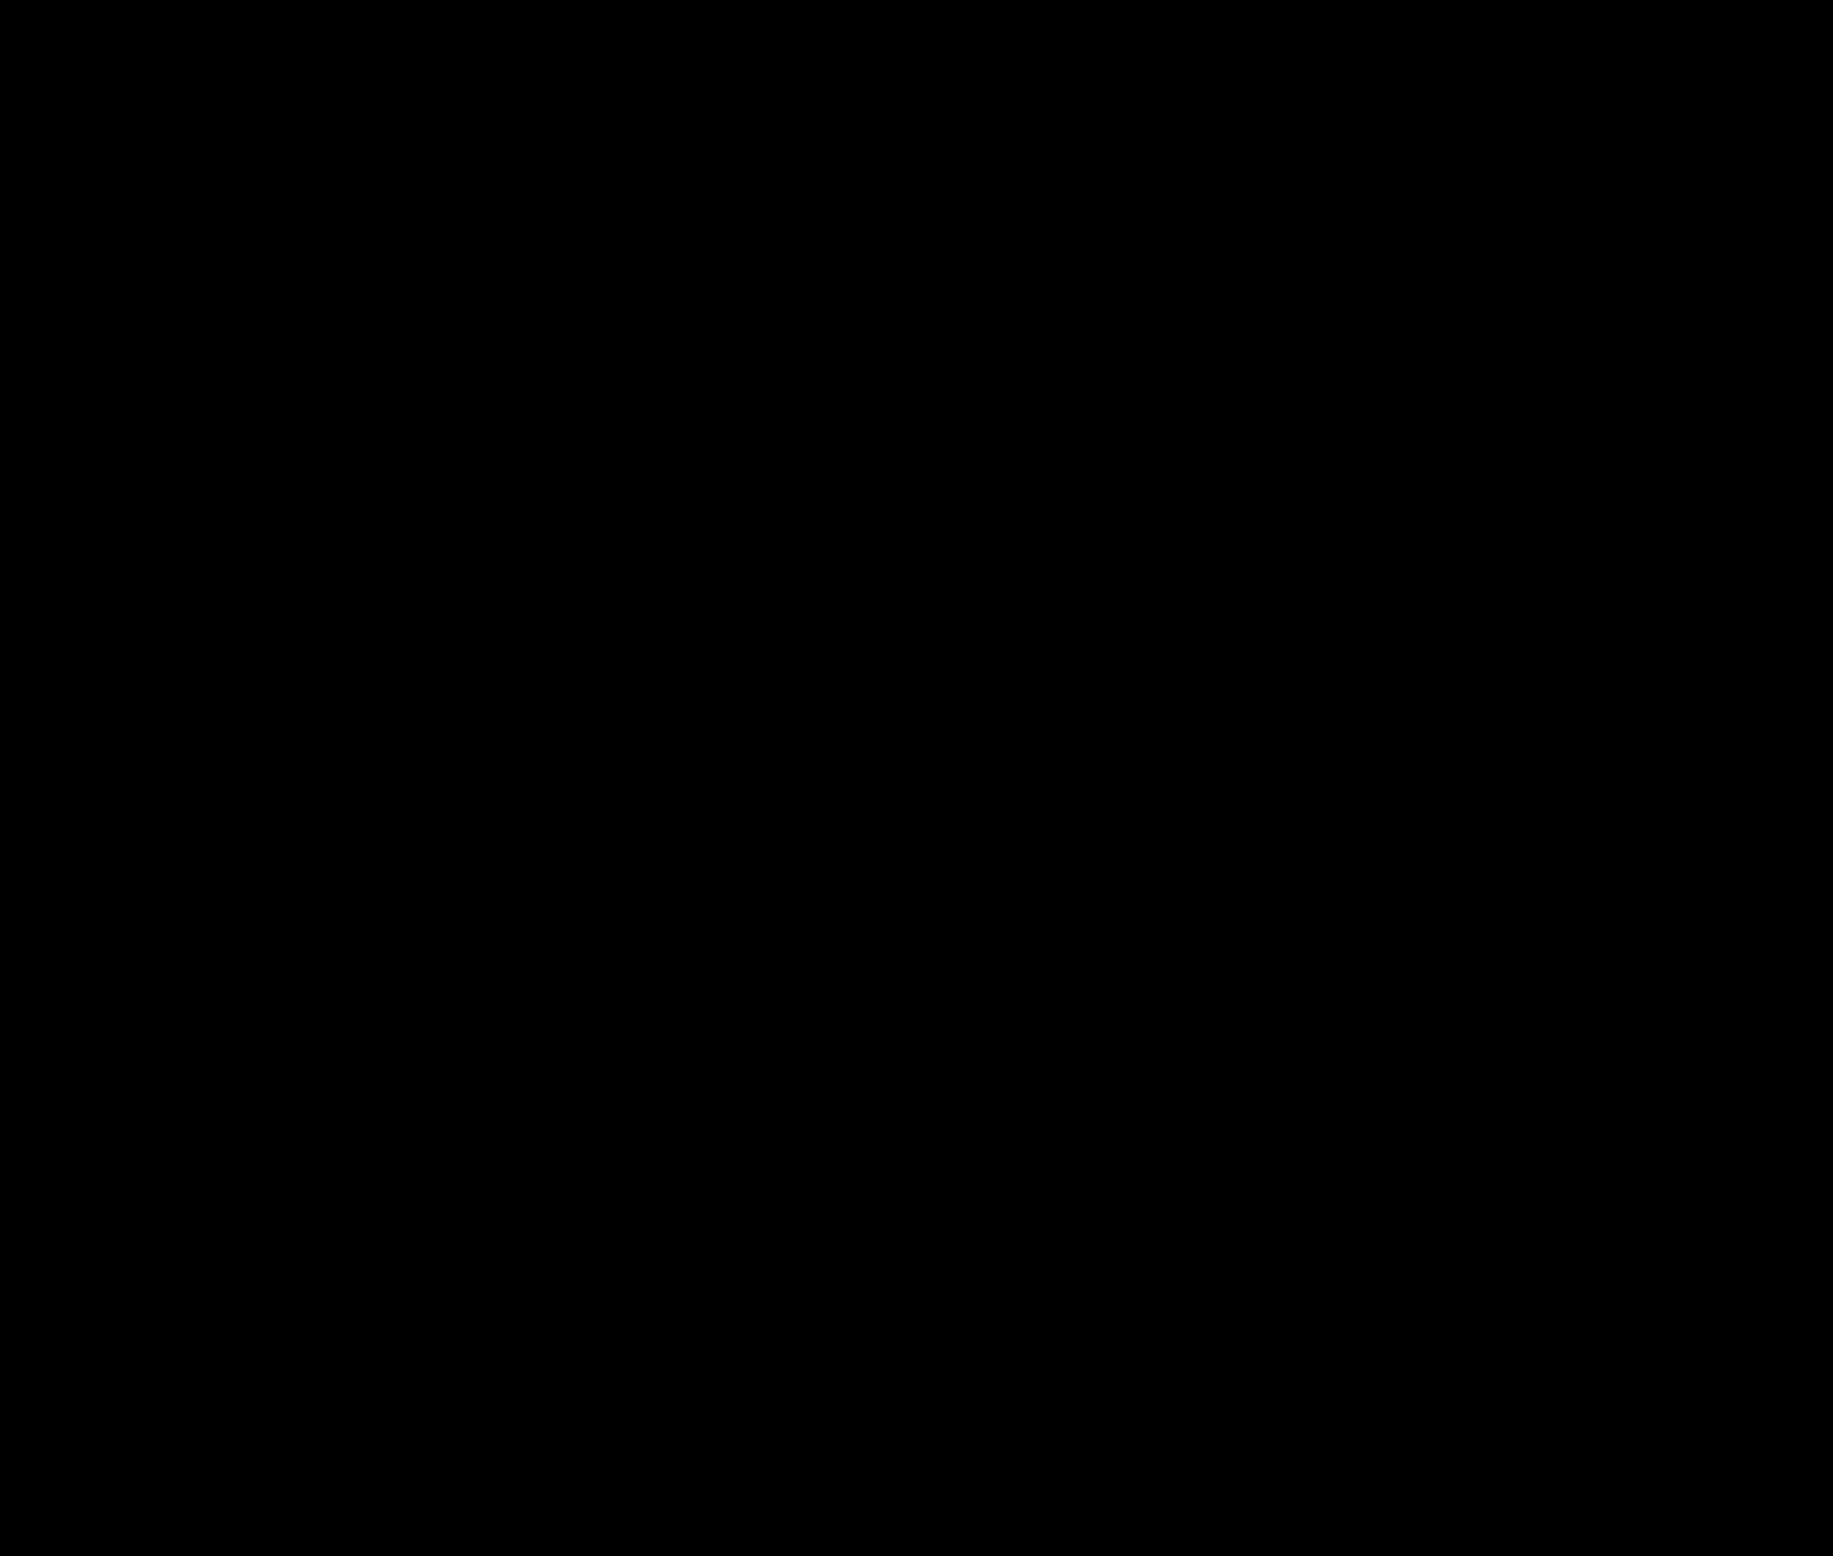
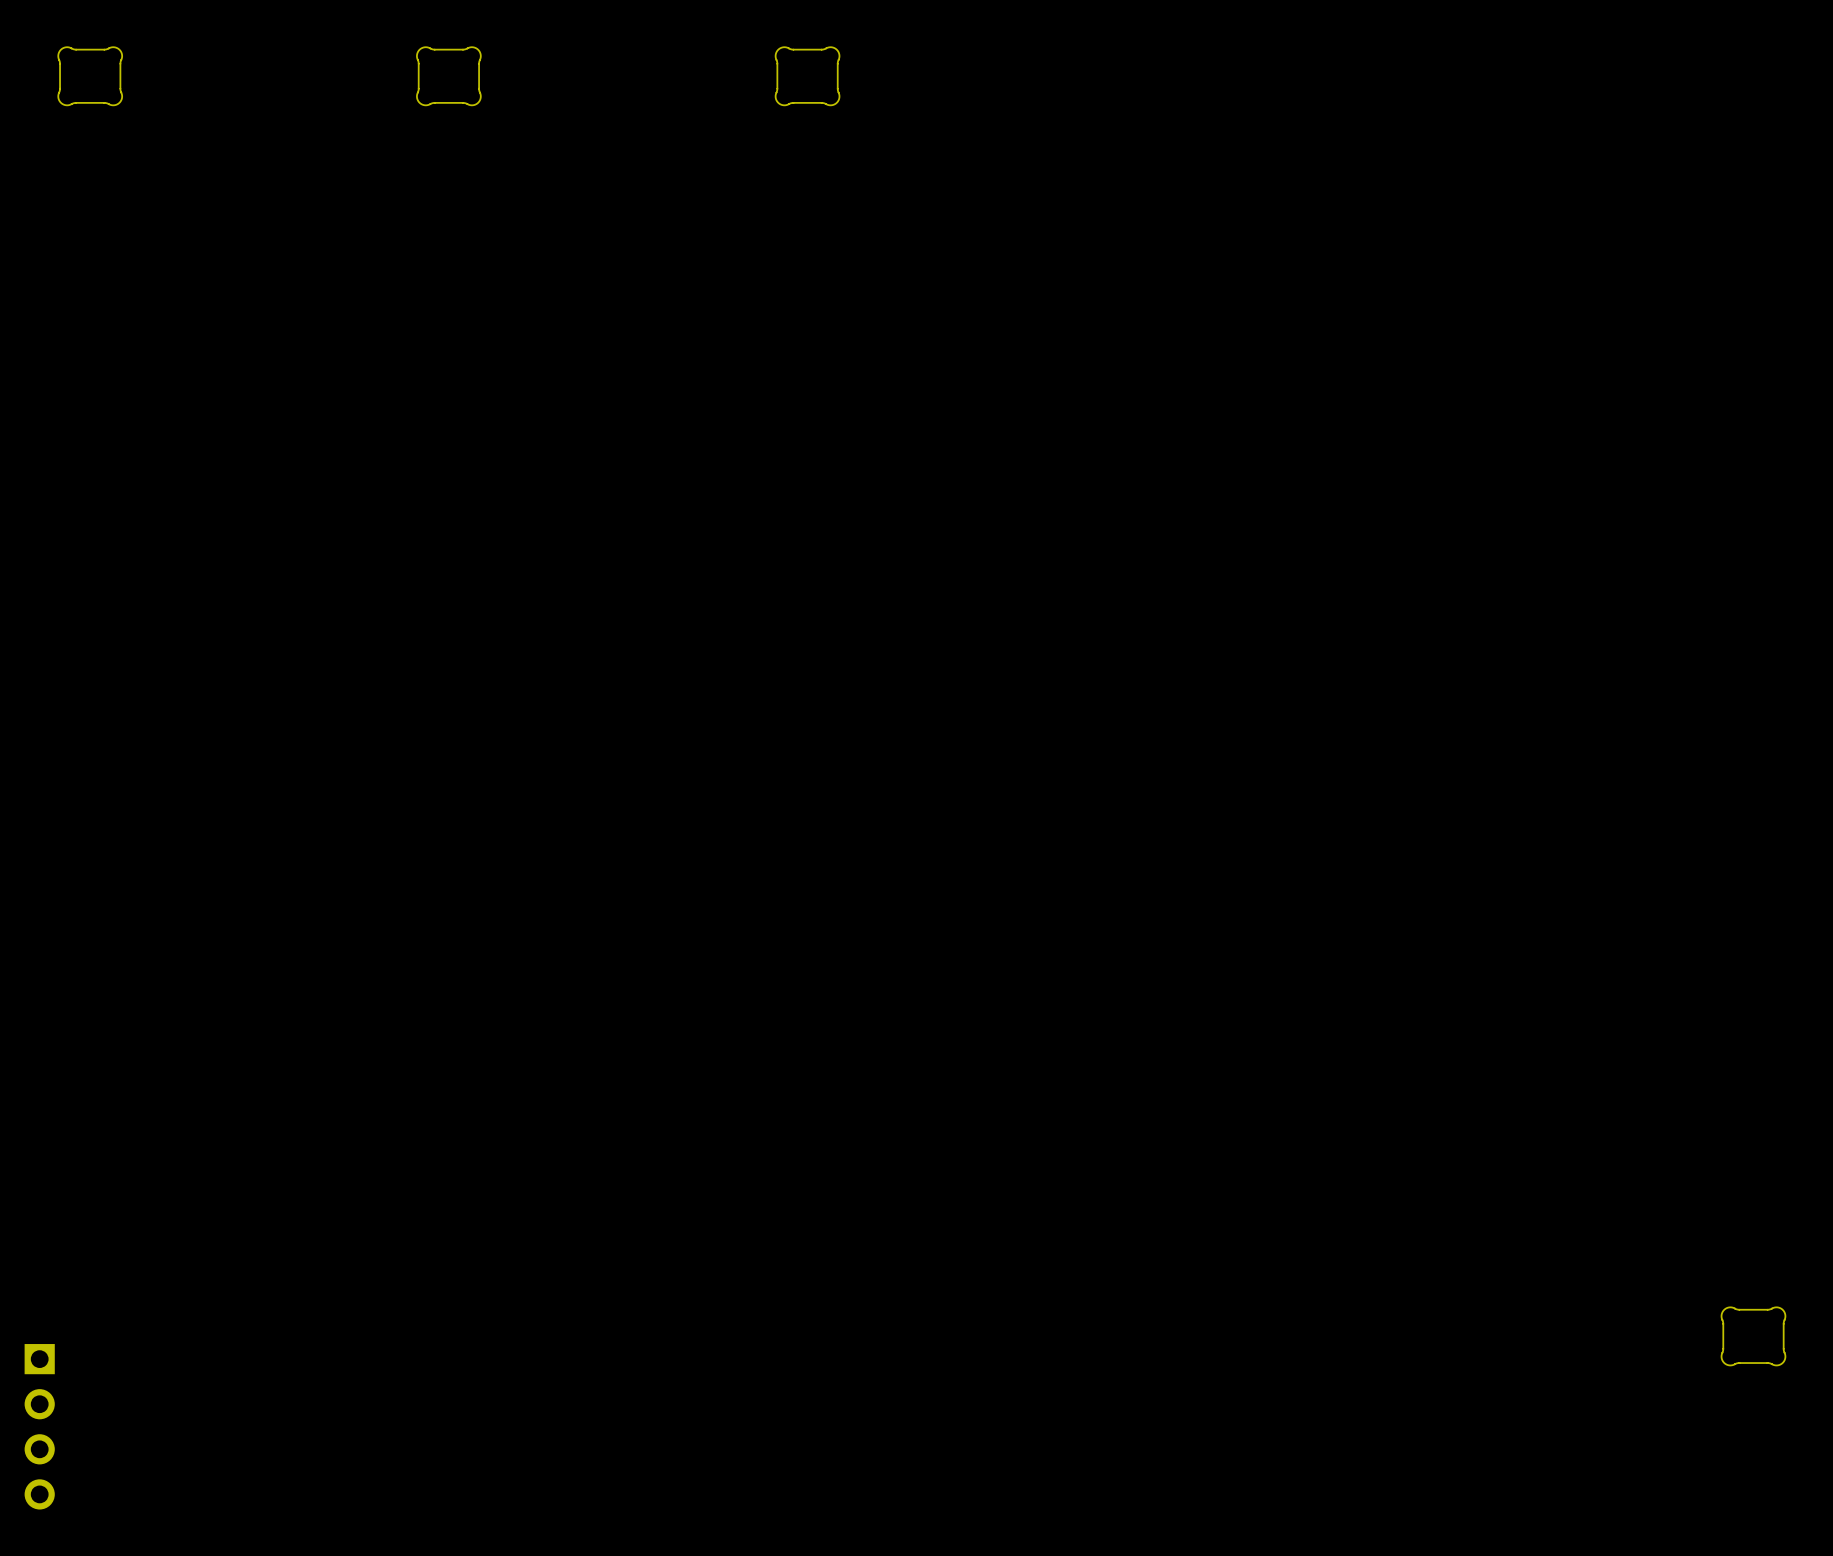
part: none -> (90, 76)
part: none -> (448, 76)
part: none -> (807, 76)
part: none -> (1753, 1336)
part: none -> (39, 1426)

